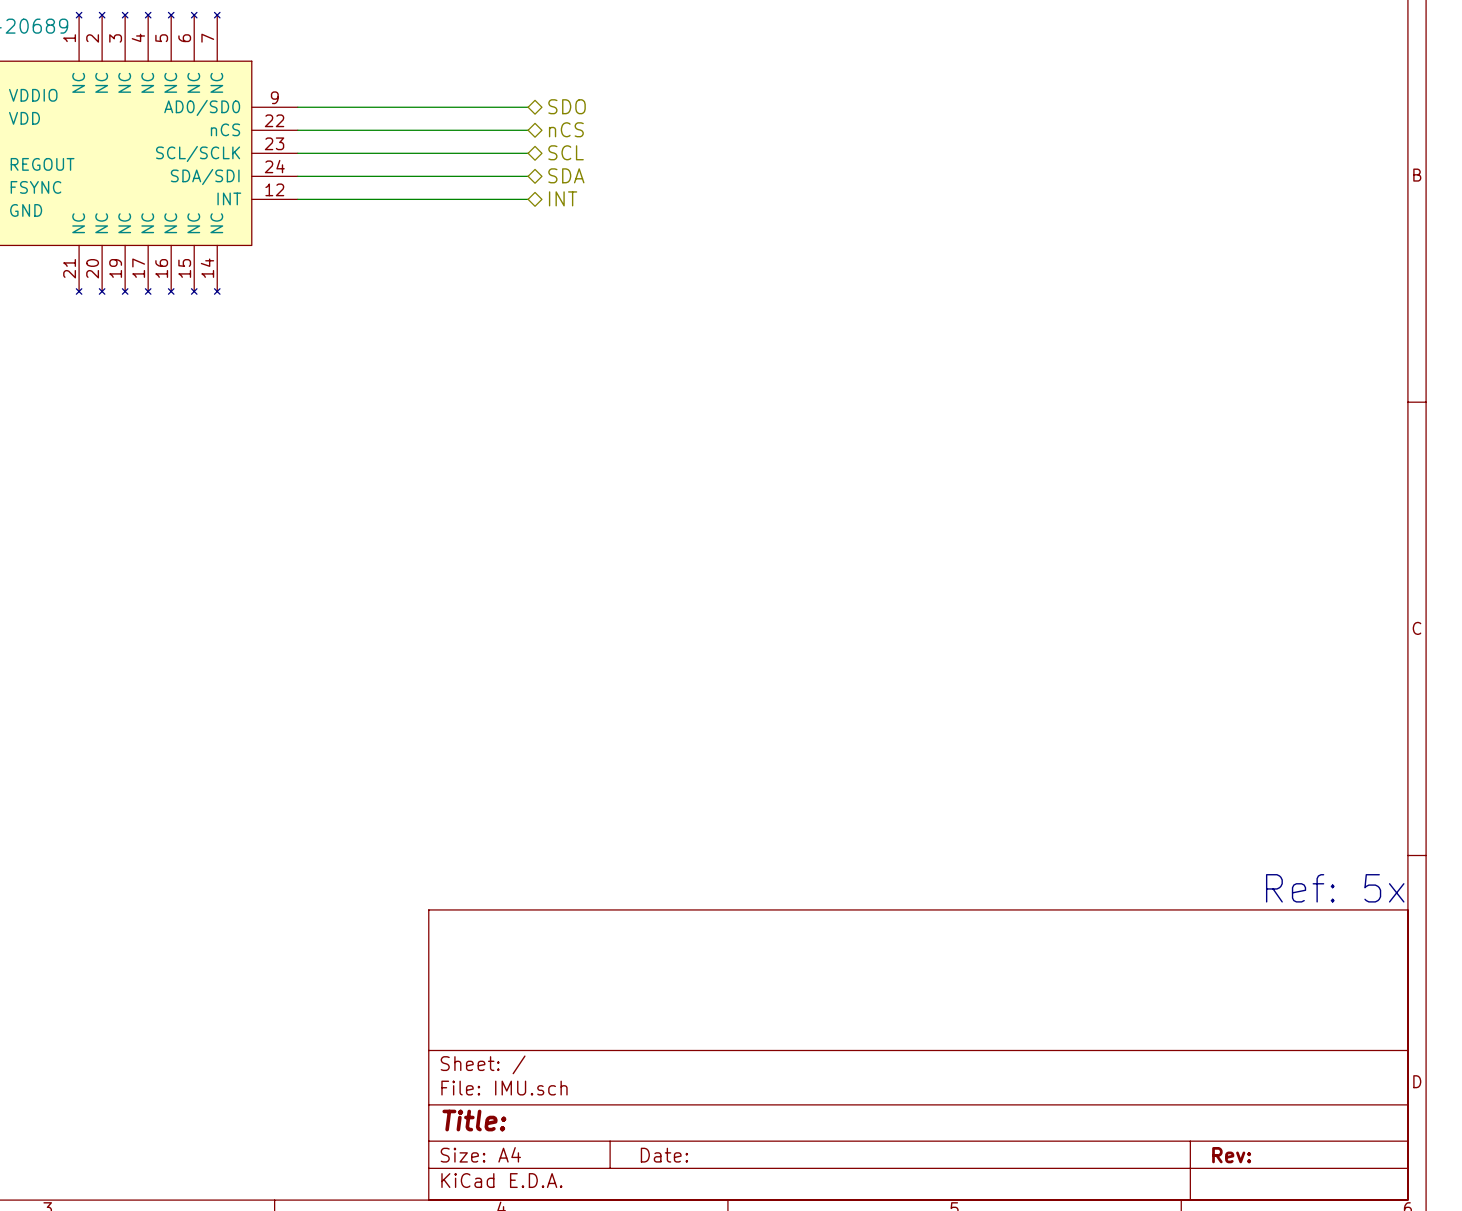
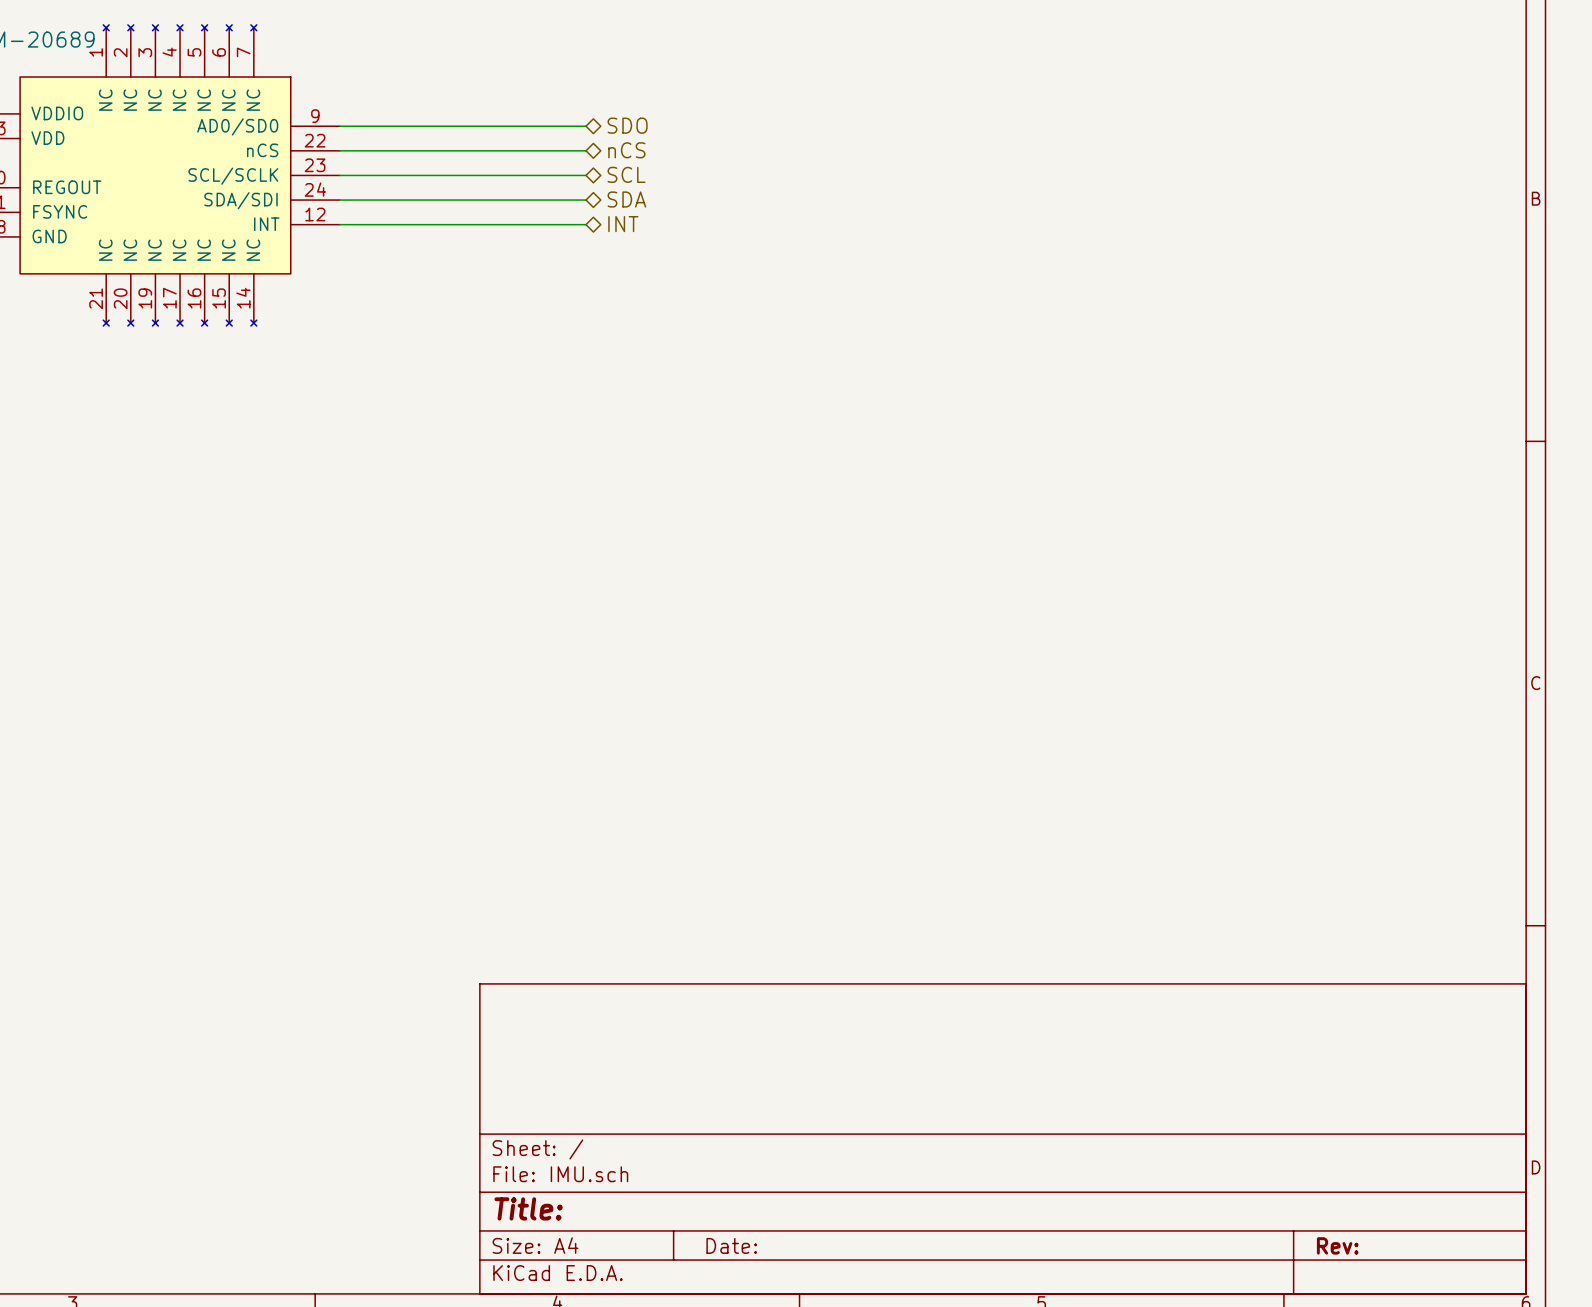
text: Ref: 5x (1335, 888) -> none

